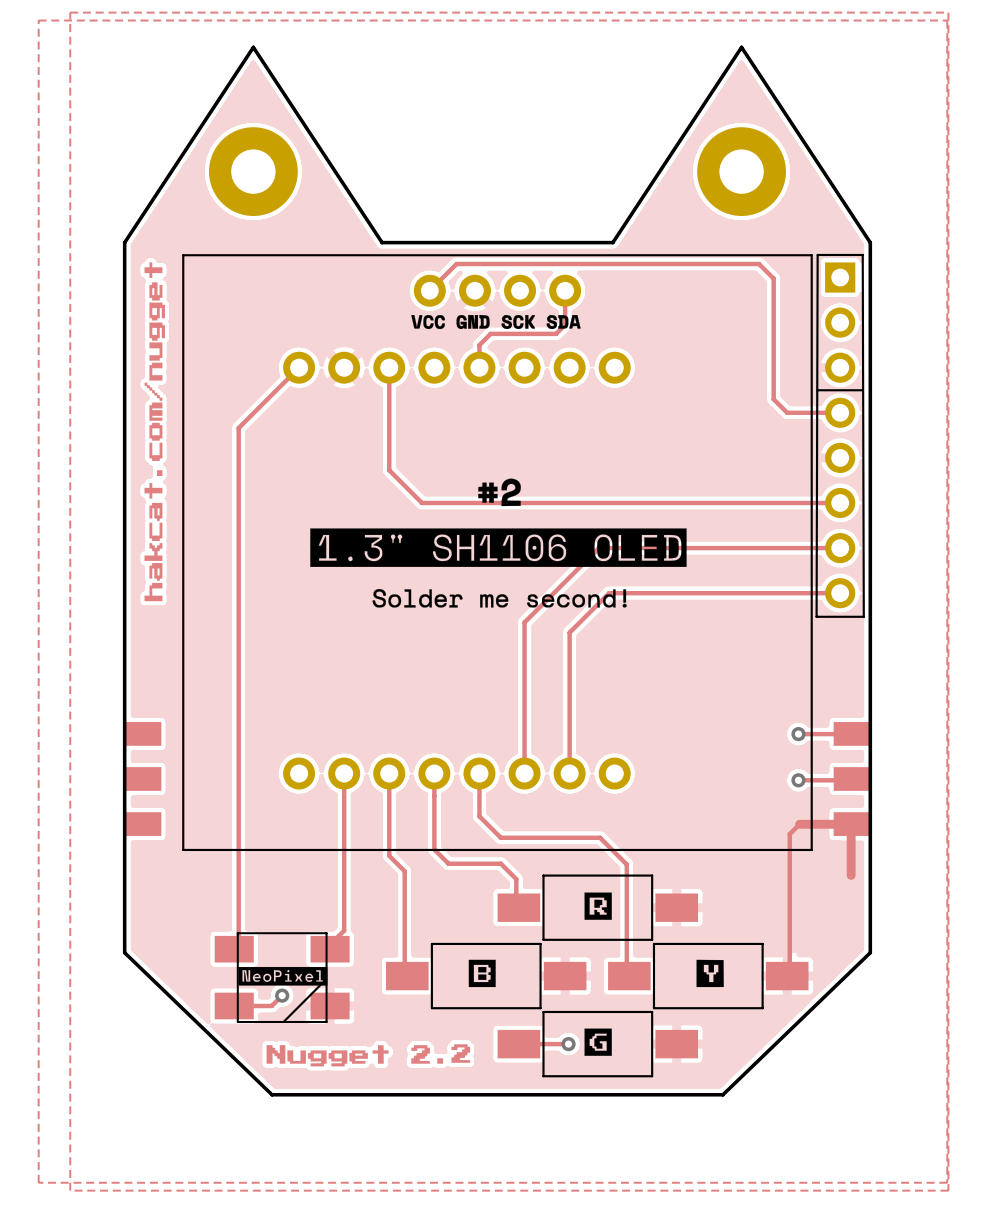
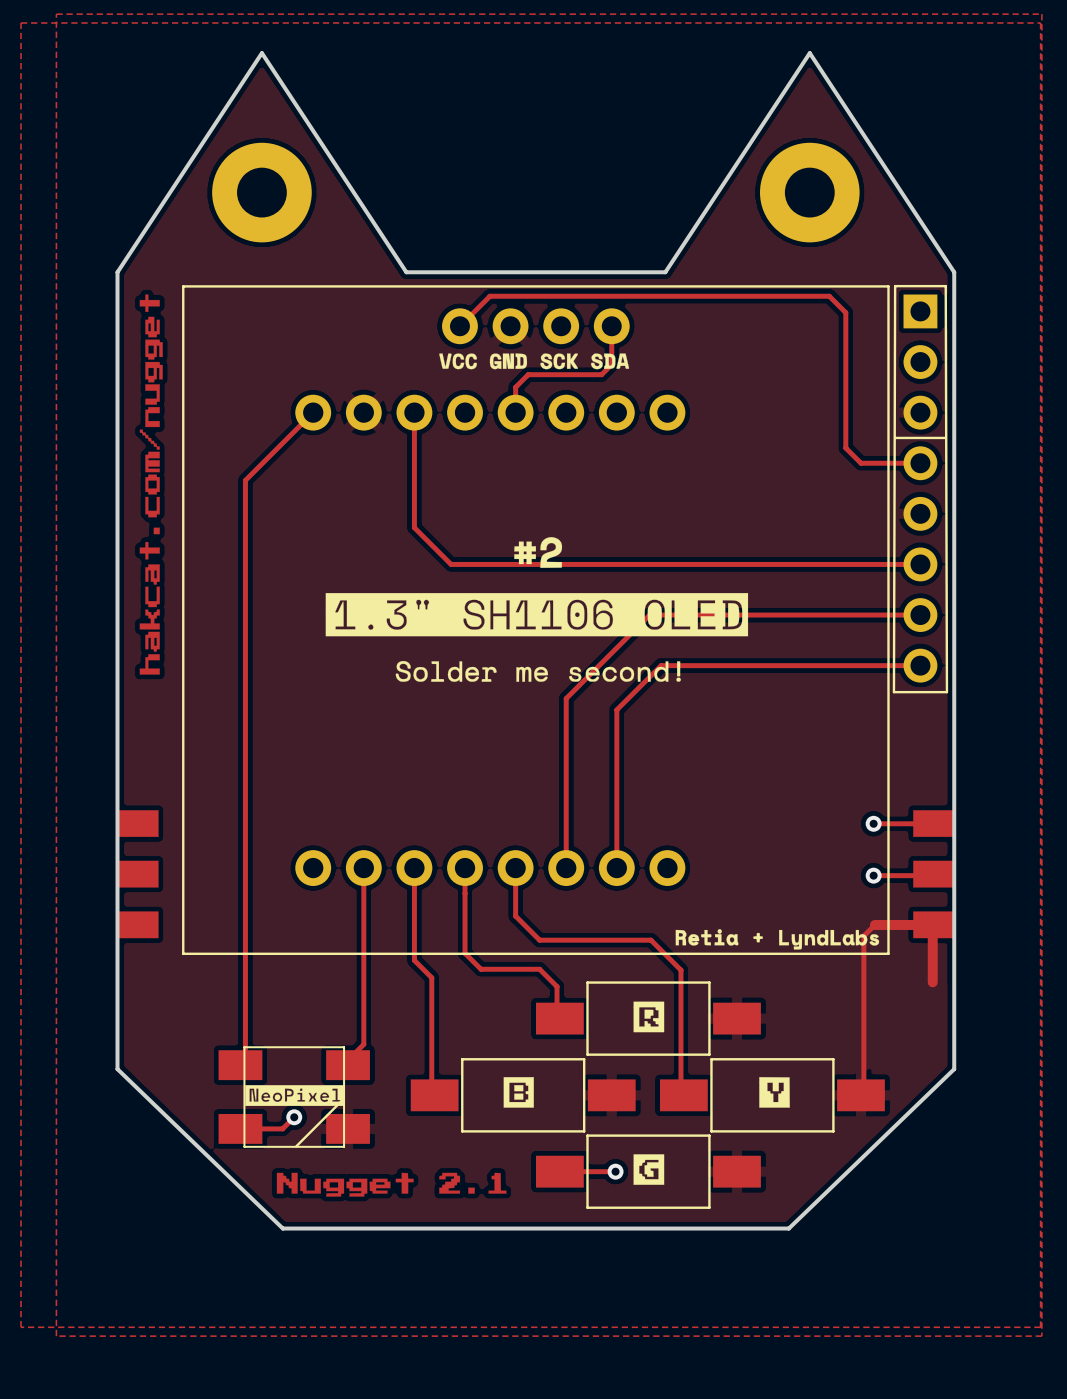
drawing shape: [124, 262, 871, 1067] -> [117, 294, 955, 1197]

